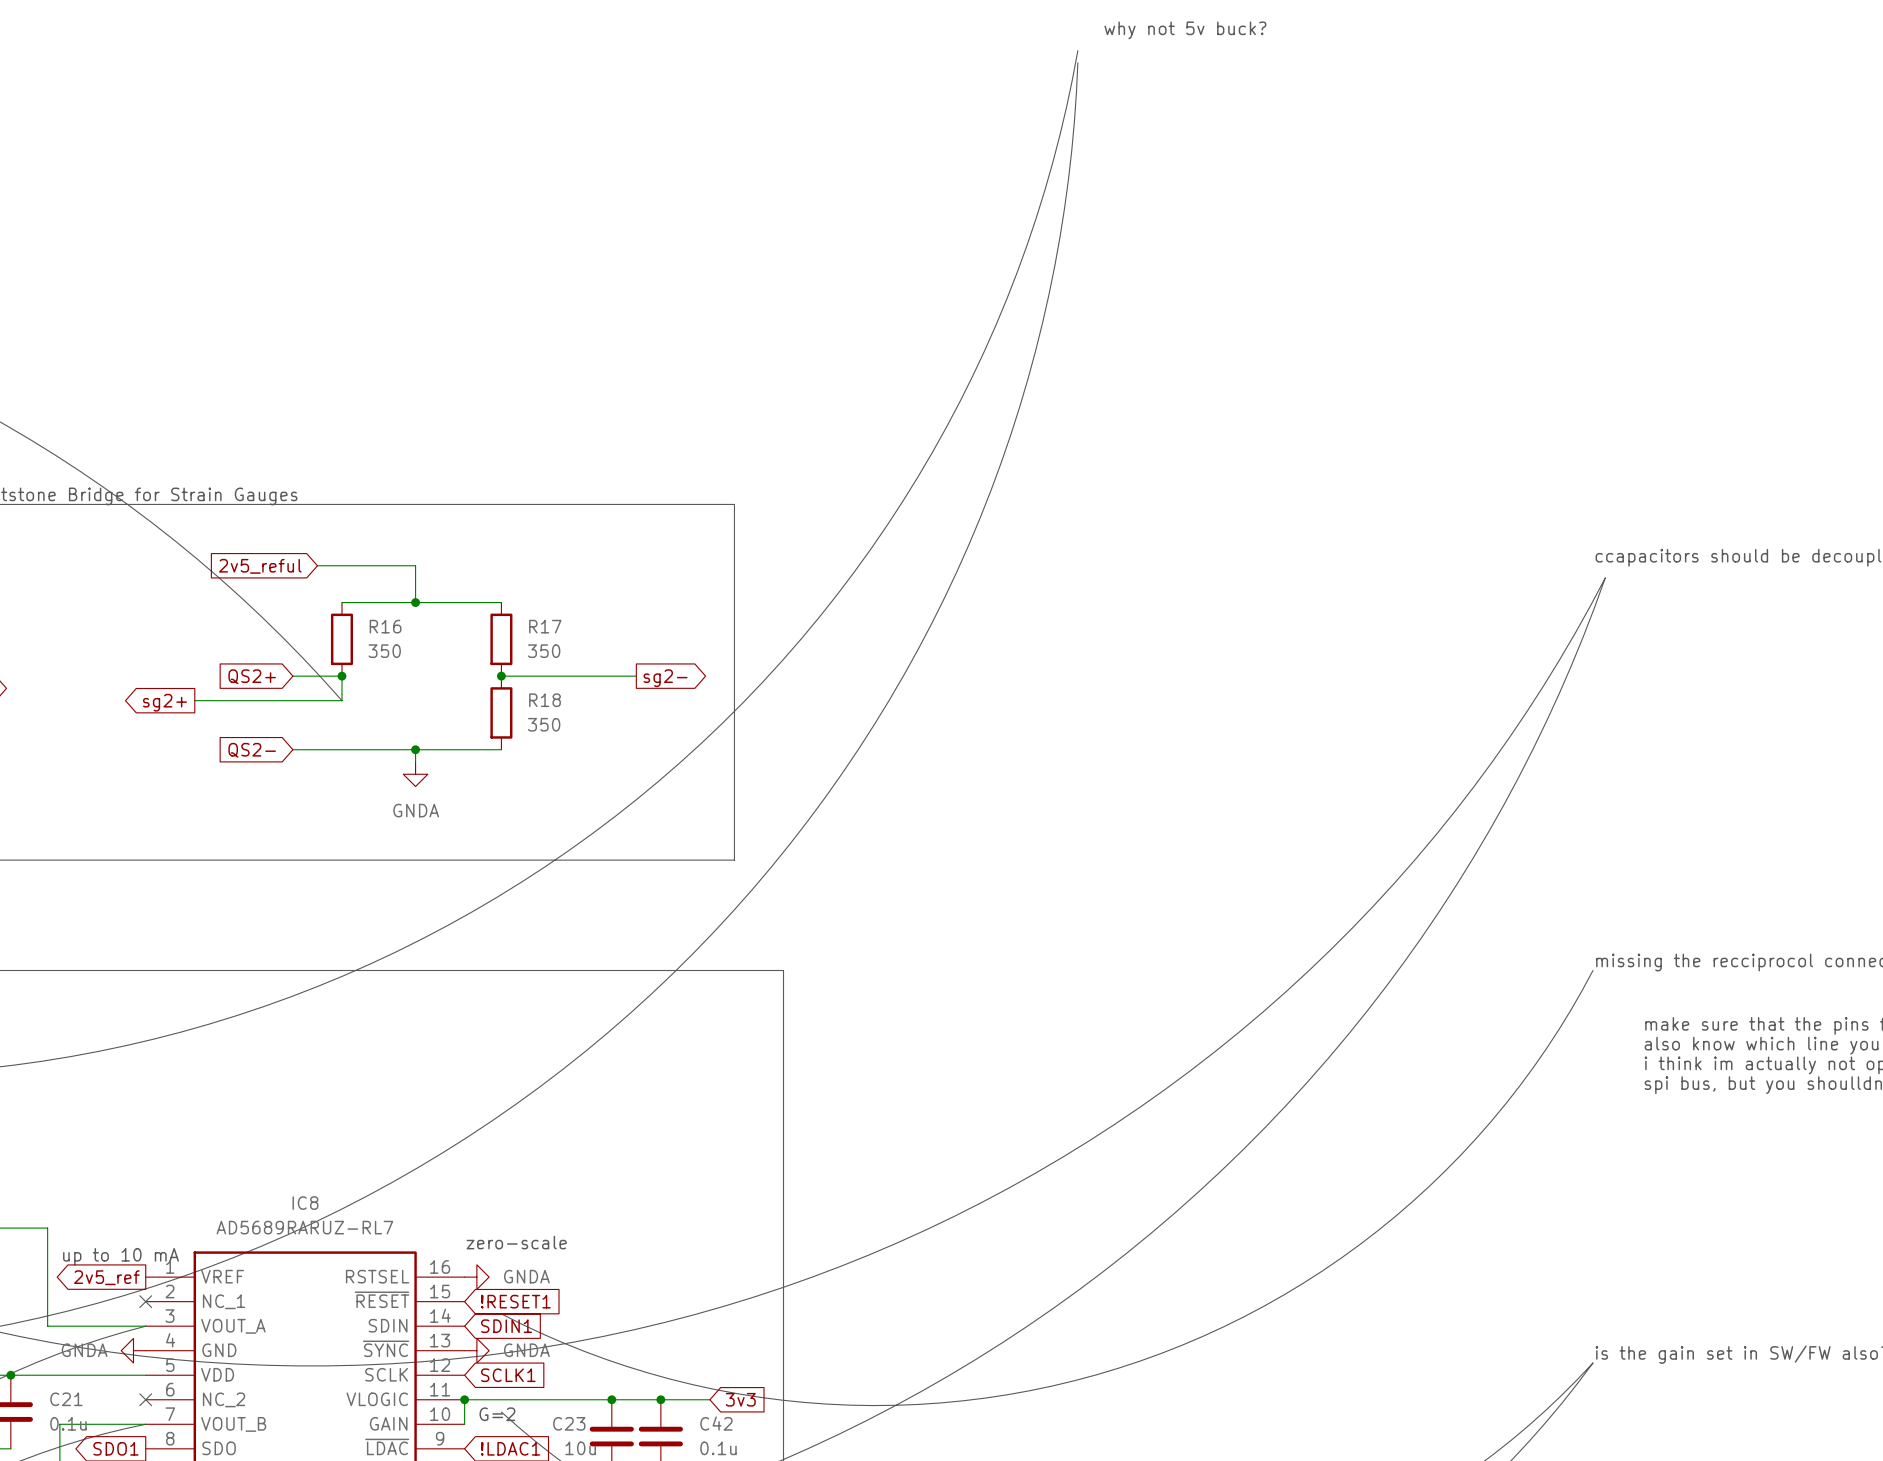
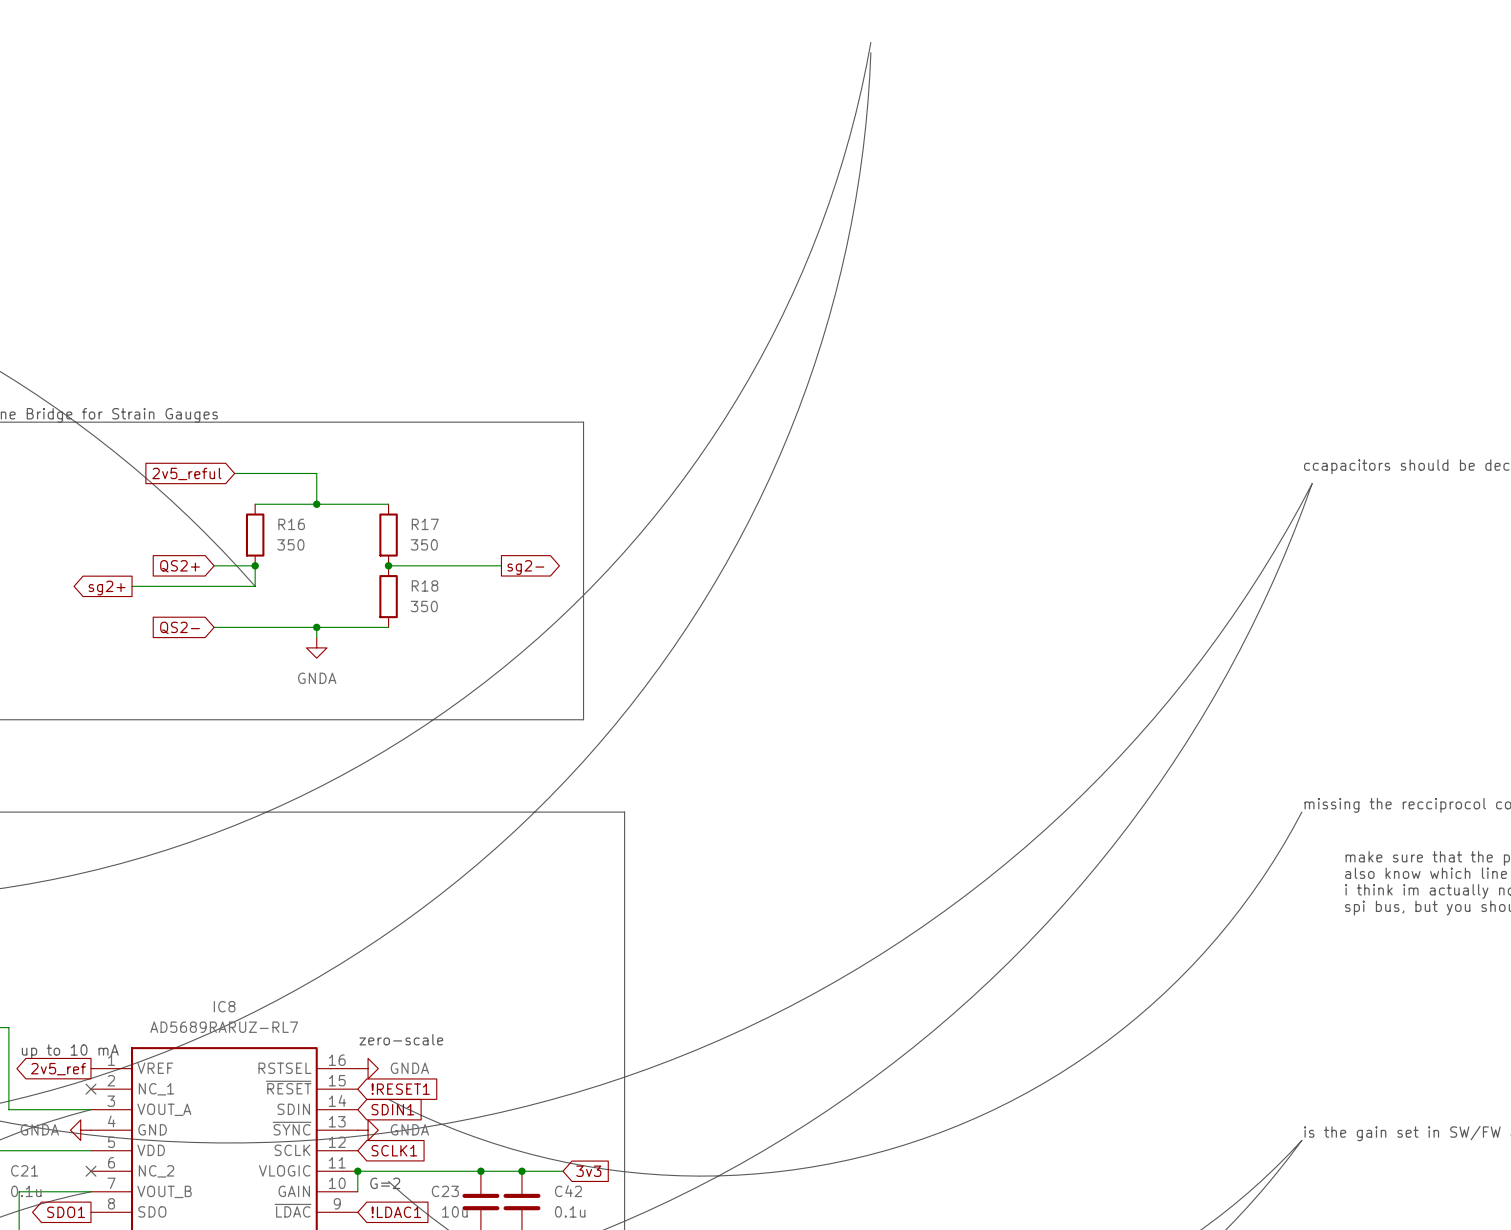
text: why not 5v buck? (1185, 30) -> none

